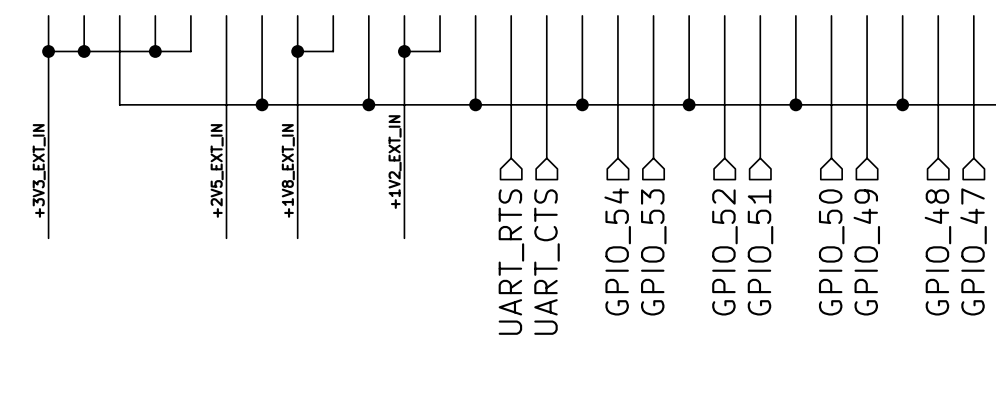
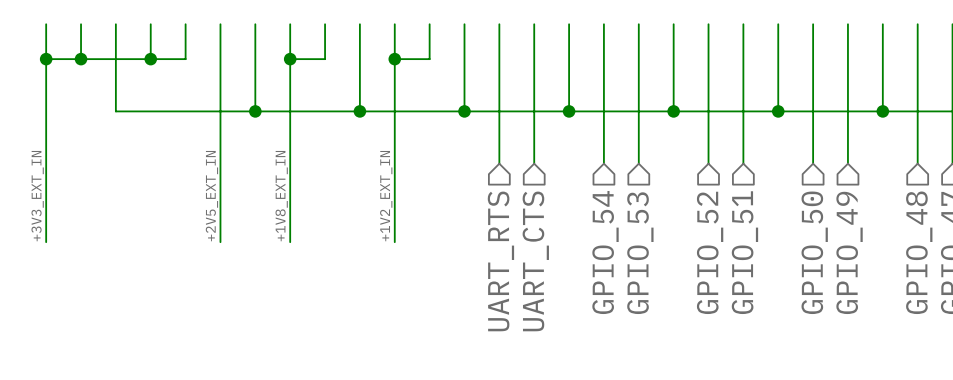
label position: +1V2_EXT_IN (395, 162) -> +1V2_EXT_IN (386, 196)
label position: +3V3_EXT_IN (39, 170) -> +3V3_EXT_IN (37, 196)
label position: +2V5_EXT_IN (217, 170) -> +2V5_EXT_IN (211, 196)
label position: +1V8_EXT_IN (288, 170) -> +1V8_EXT_IN (281, 196)

